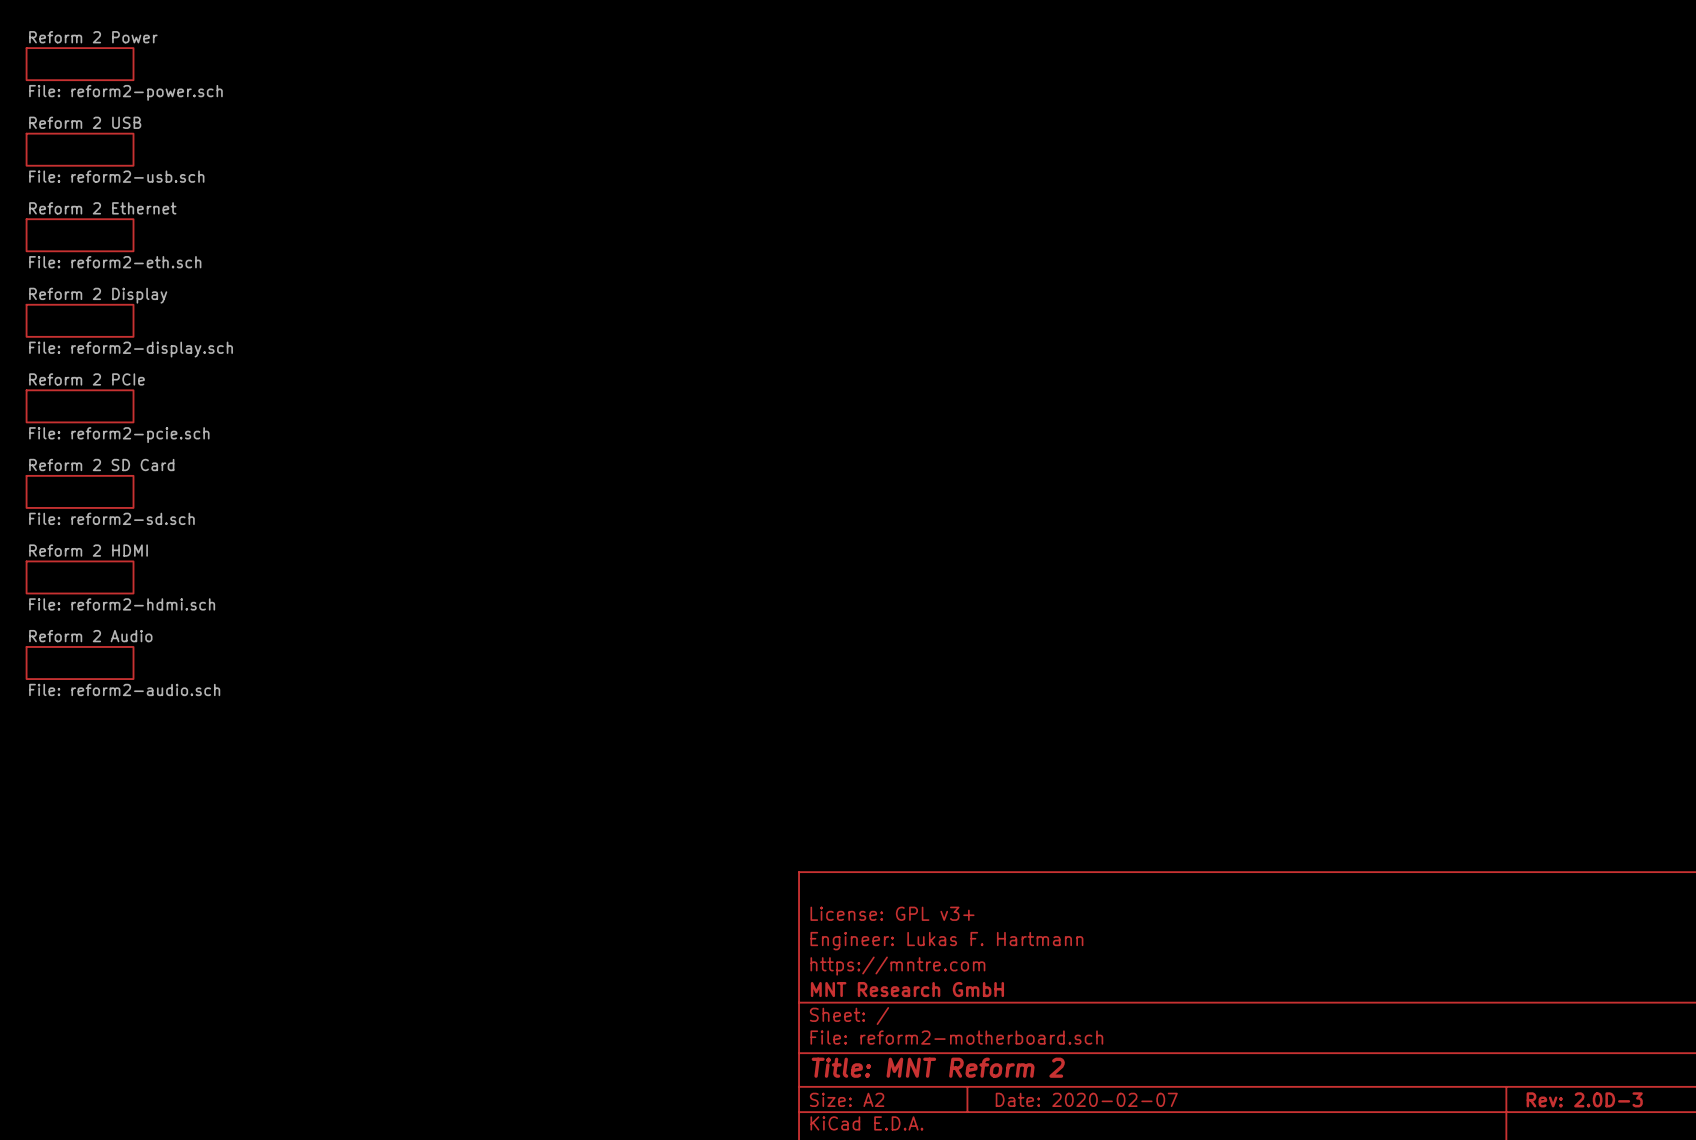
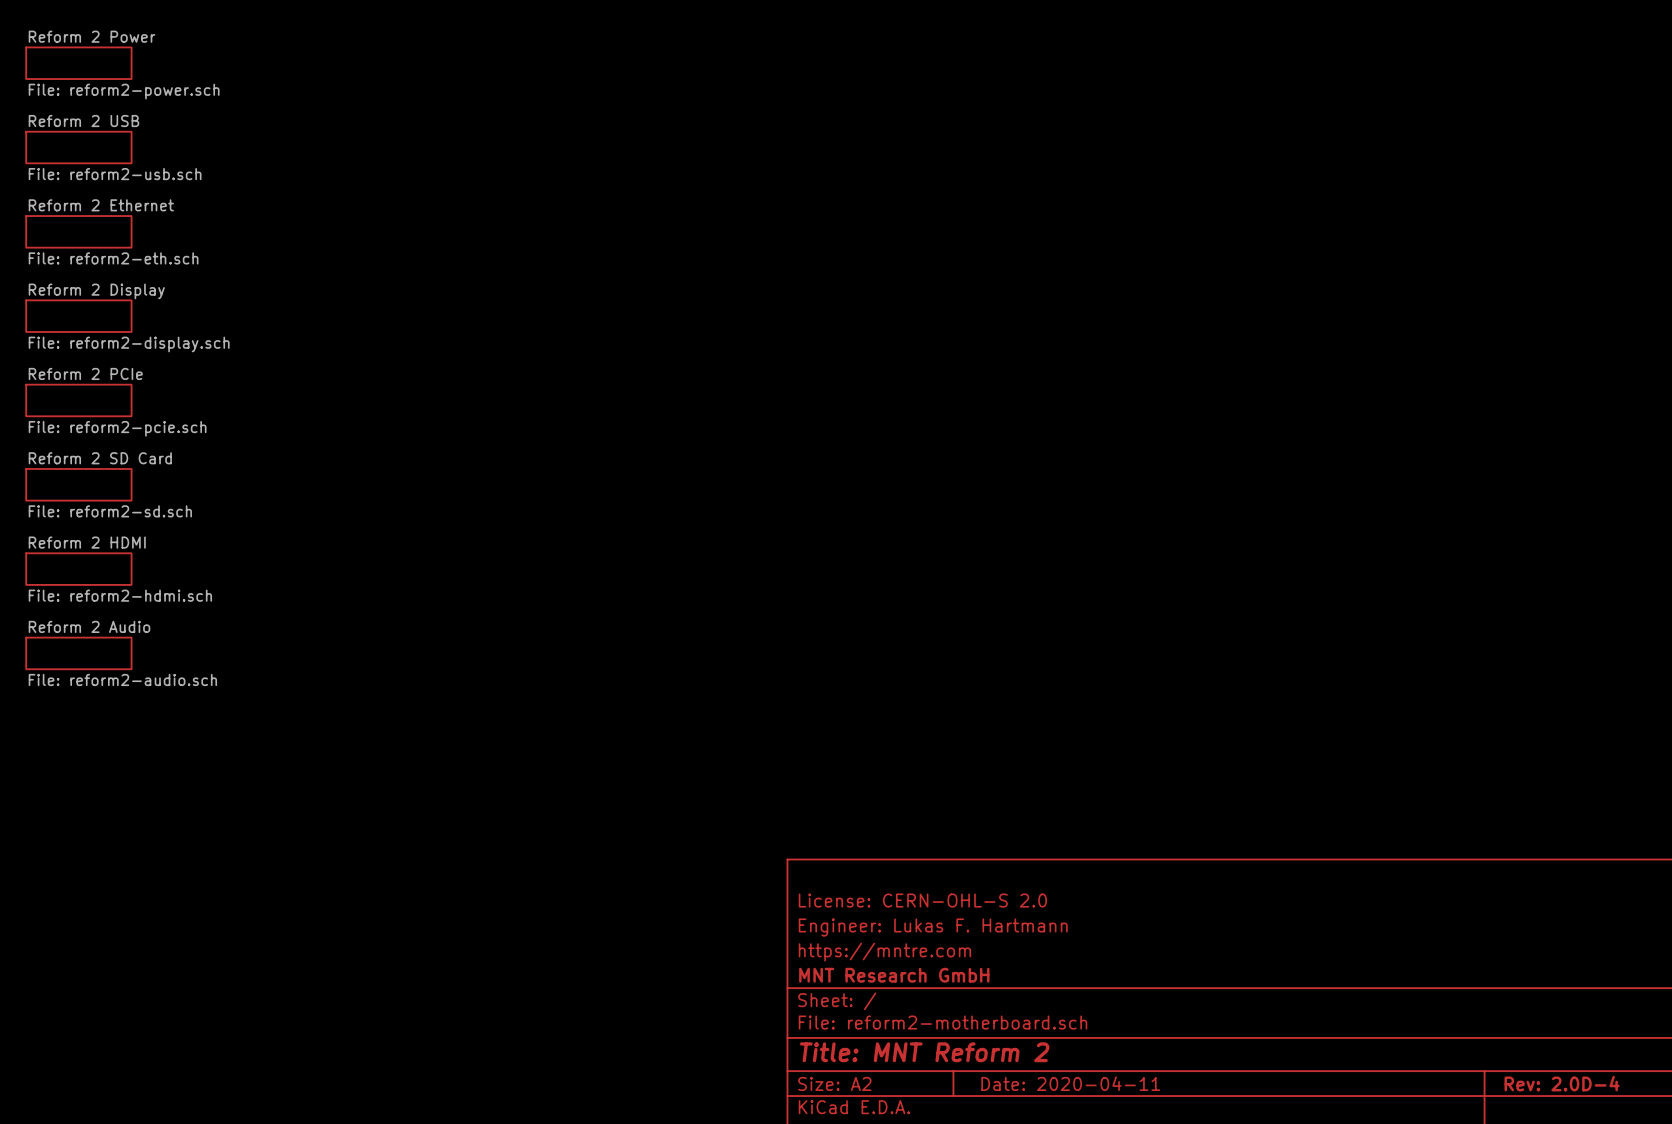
title block: License: GPL v3+ (892, 913) -> License: CERN-OHL-S 2.0 (922, 900)
title block: Date: 2020-02-07 (1086, 1099) -> Date: 2020-04-11 (1070, 1083)
title block: Rev: 2.0D-3 (1584, 1099) -> Rev: 2.0D-4 (1562, 1083)

